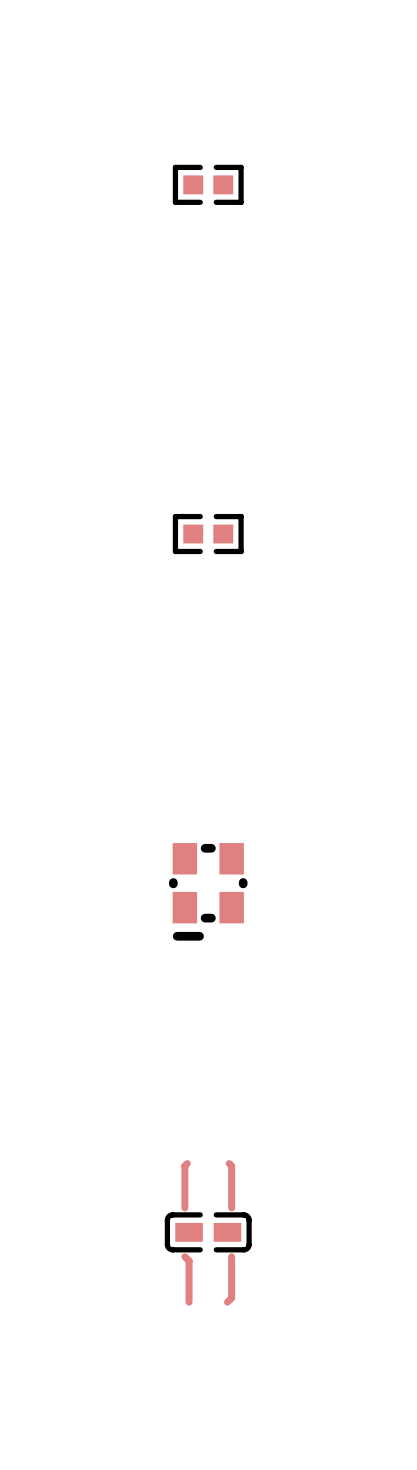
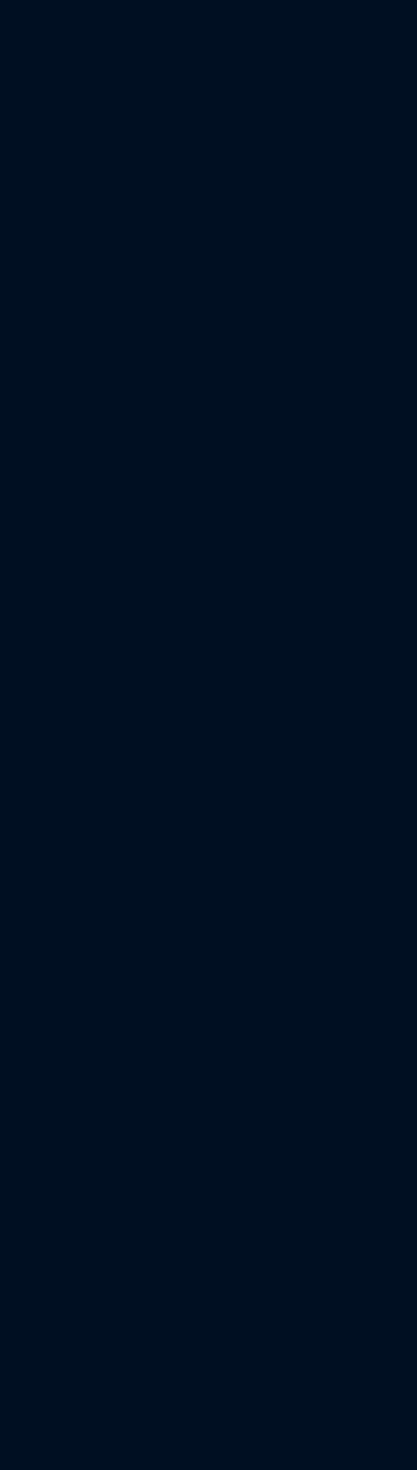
part: (208, 184) -> none
part: (208, 534) -> none
part: (208, 891) -> none
top track: (187, 1163) (184, 1166) (184, 1207) -> none
top track: (229, 1163) (231, 1166) (231, 1207) -> none
part: (208, 1232) -> none
top track: (184, 1256) (189, 1260) (189, 1302) -> none
top track: (231, 1256) (231, 1298) (227, 1302) -> none

